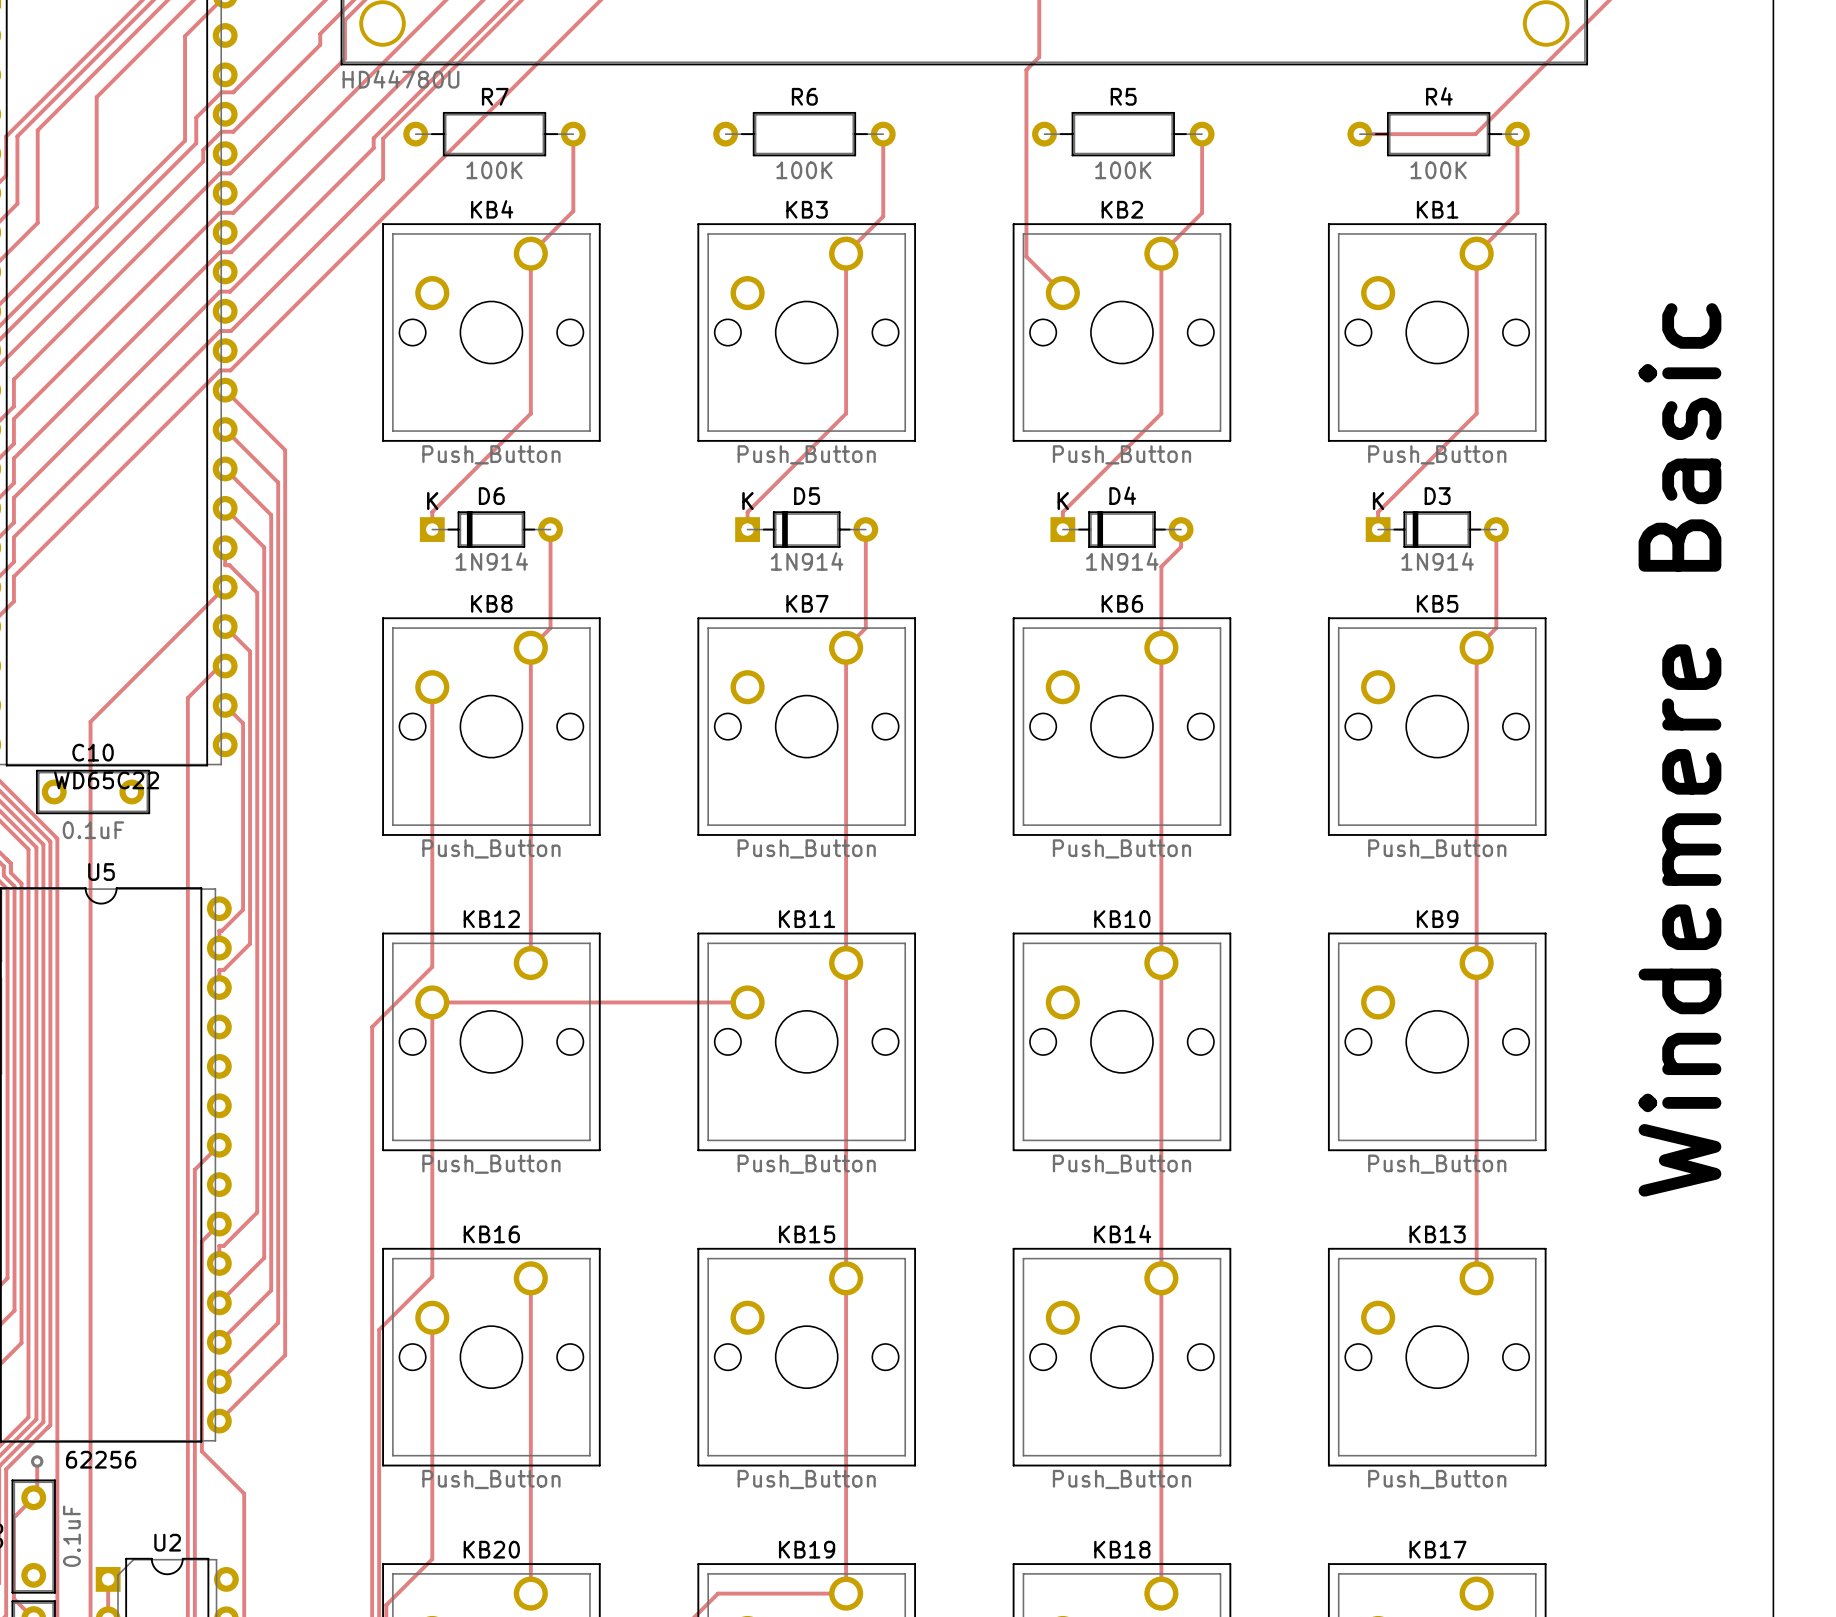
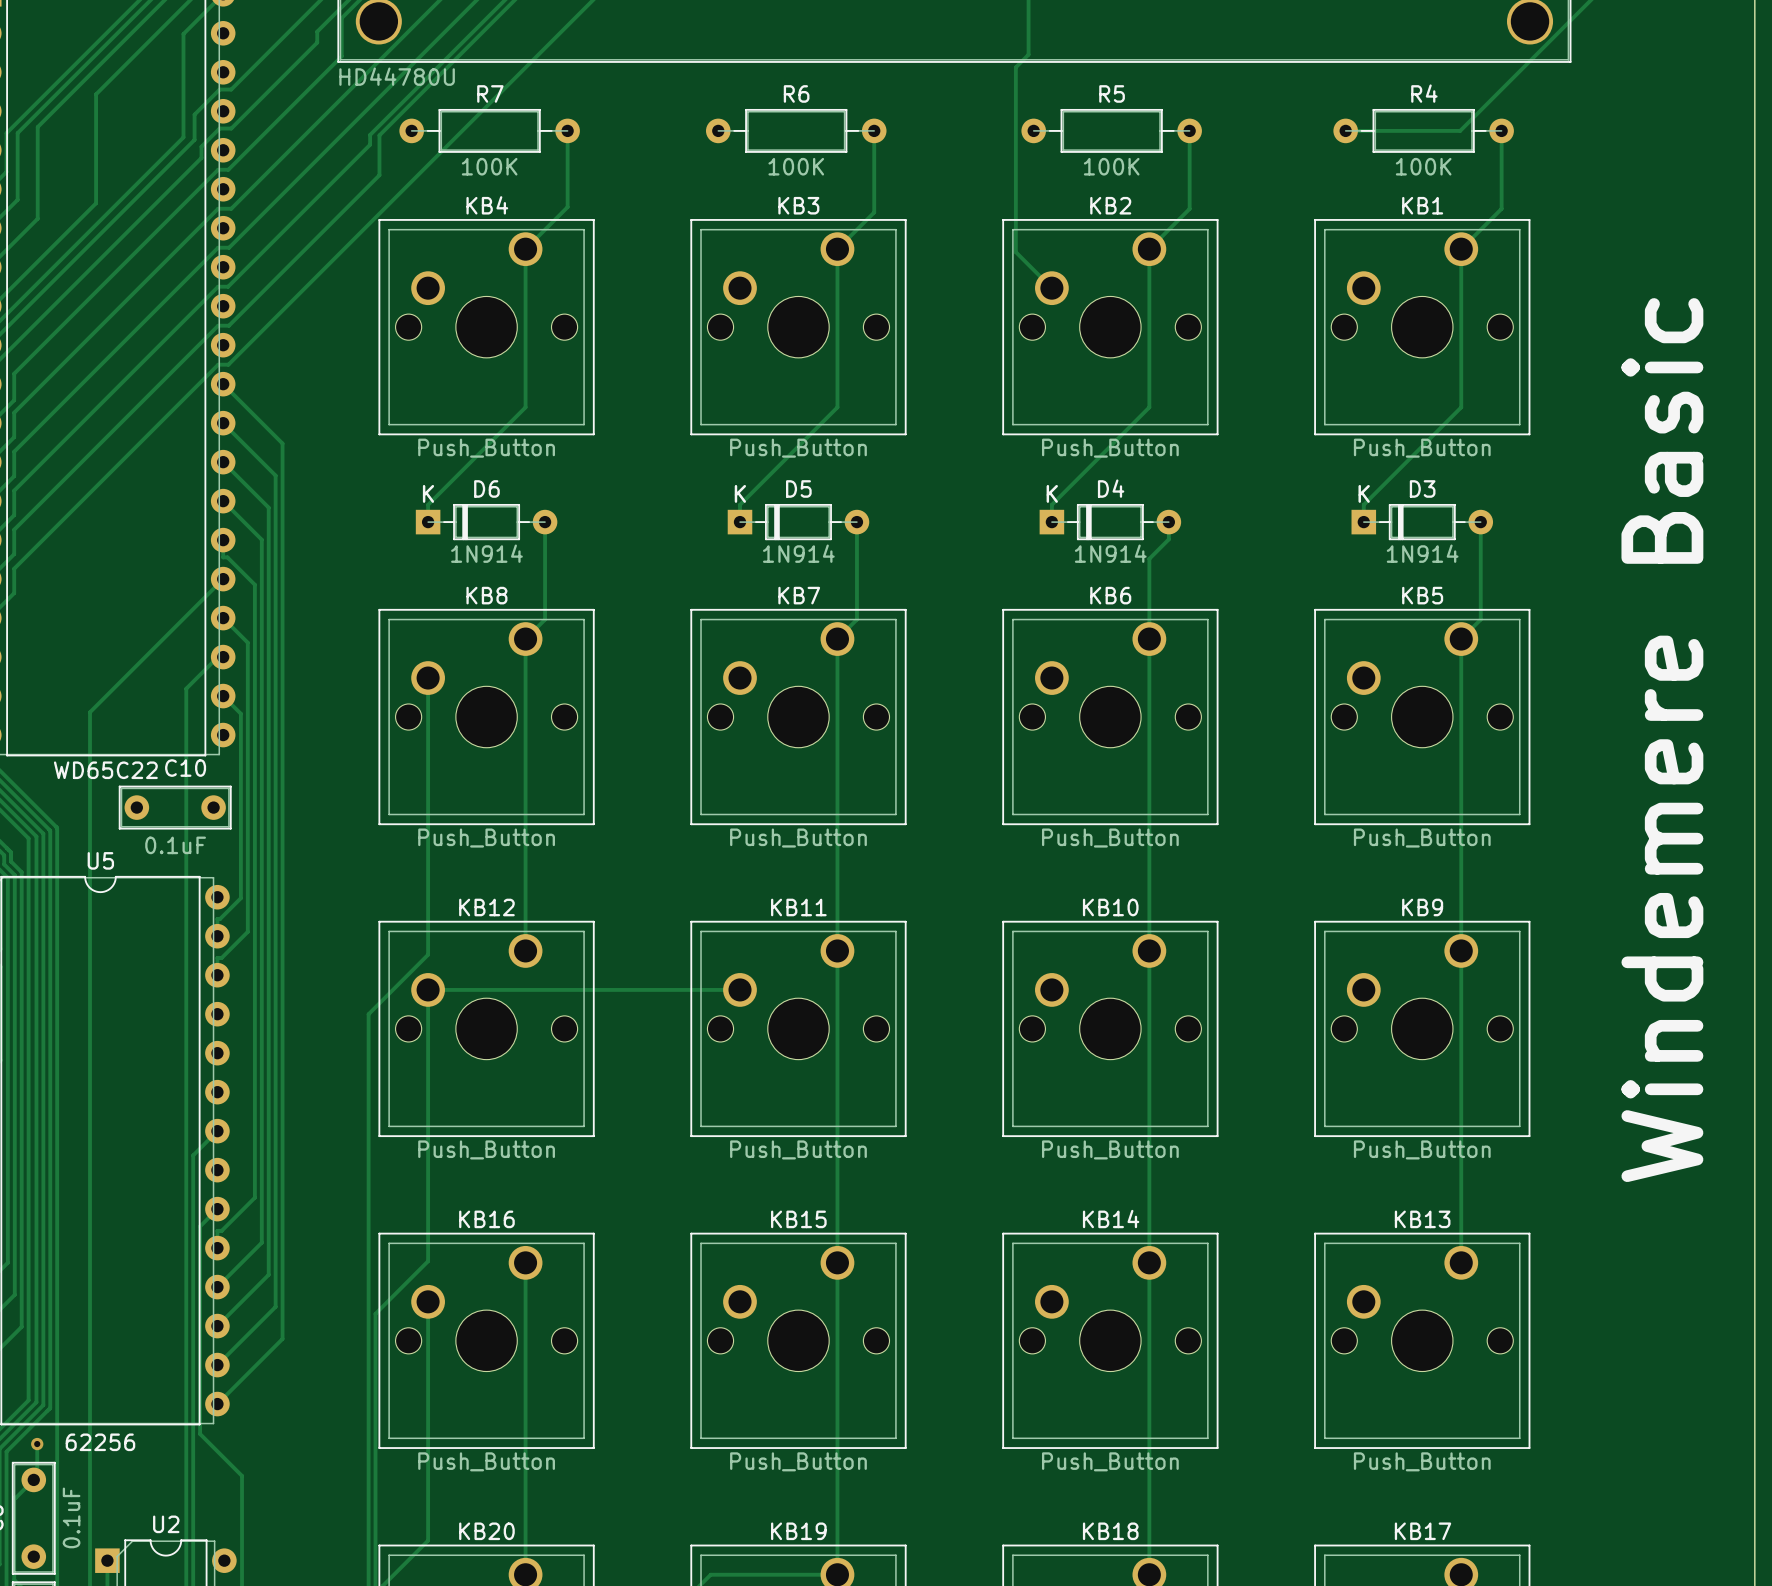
C10 name position: C10 (93, 752) -> C10 (185, 768)
C10 position: (93, 792) -> (175, 807)

